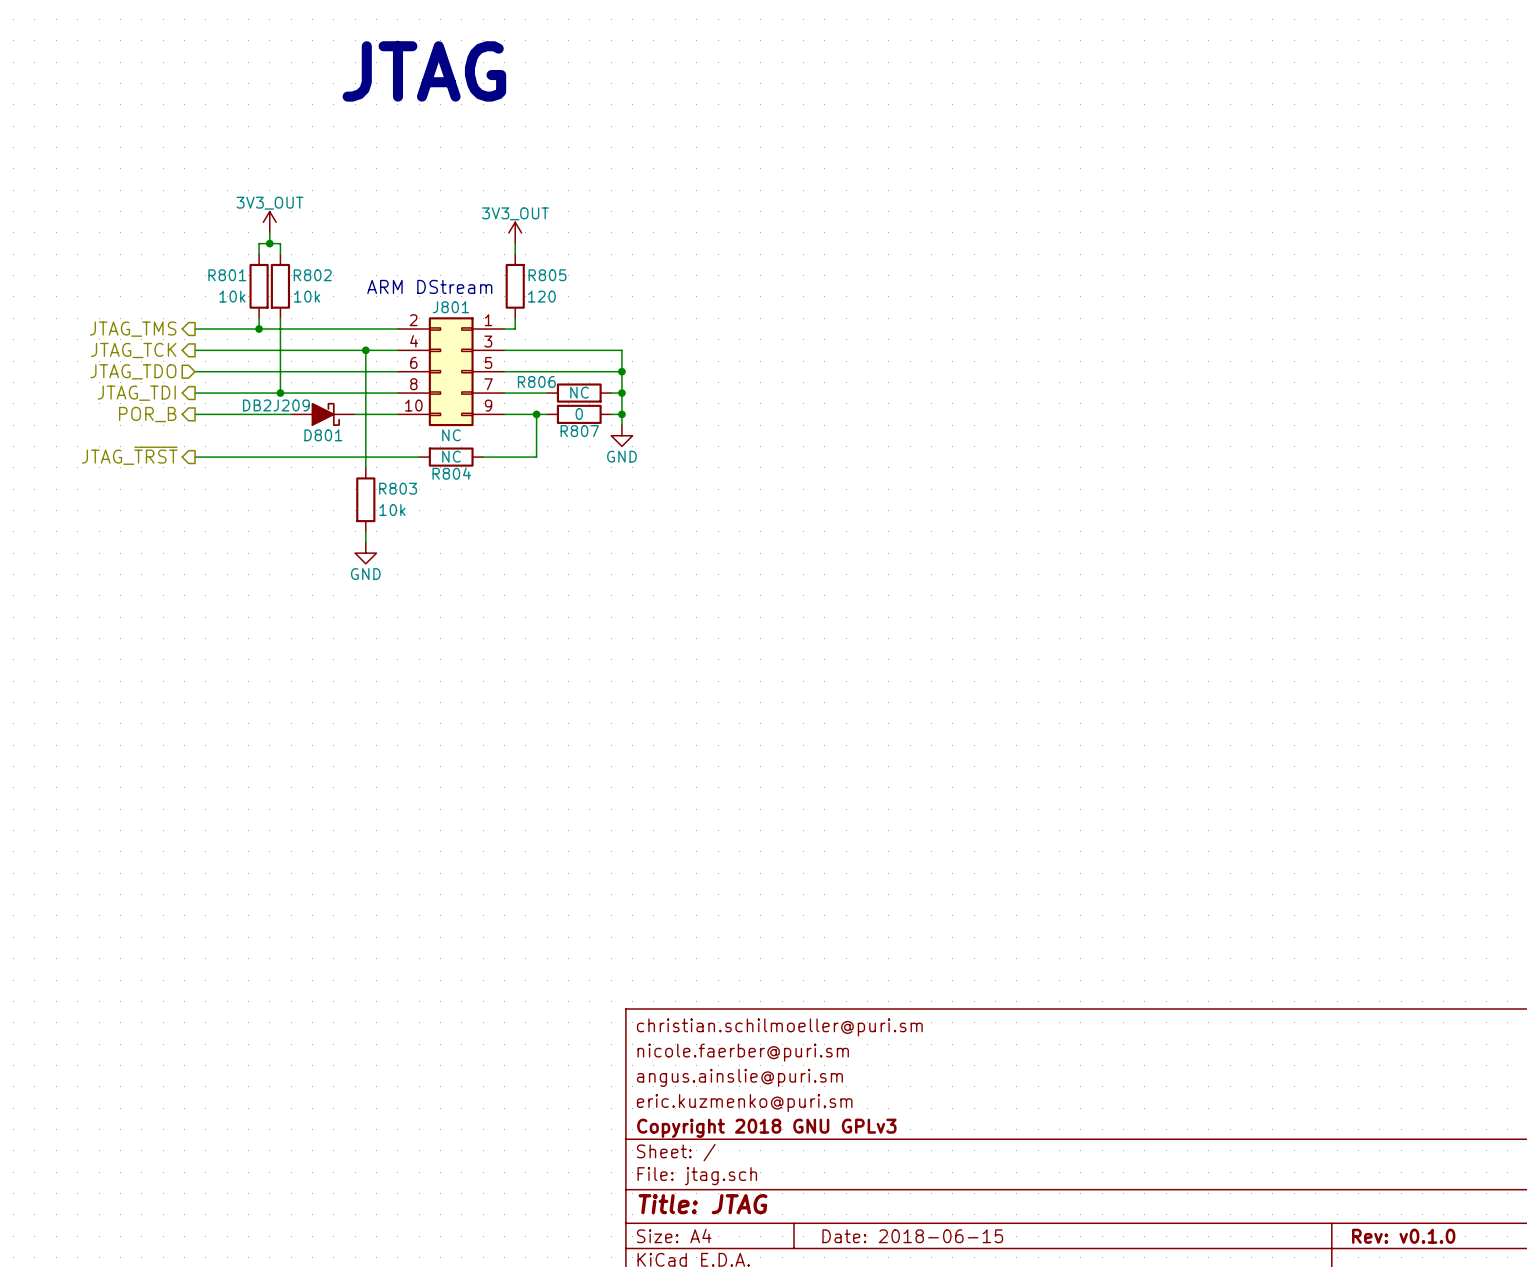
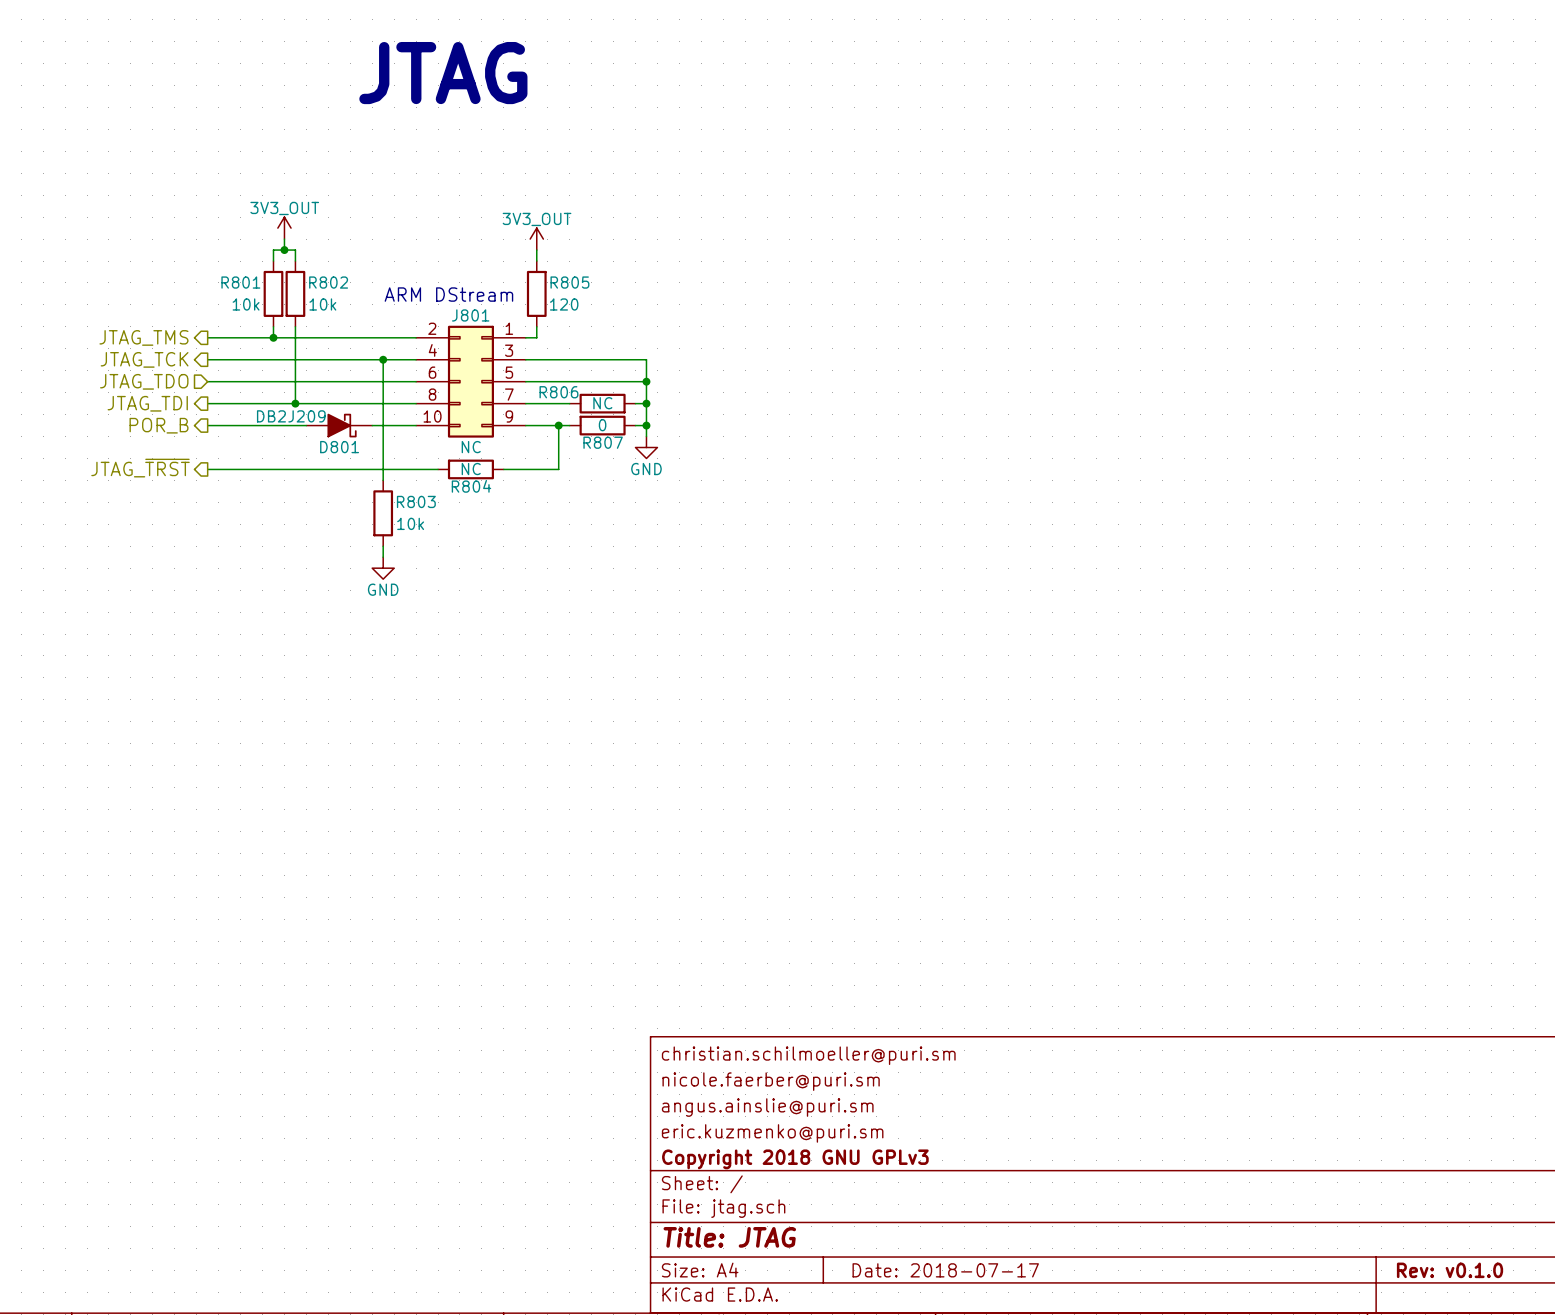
title block: Date: 2018-06-15 (912, 1236) -> Date: 2018-07-17 (945, 1270)

